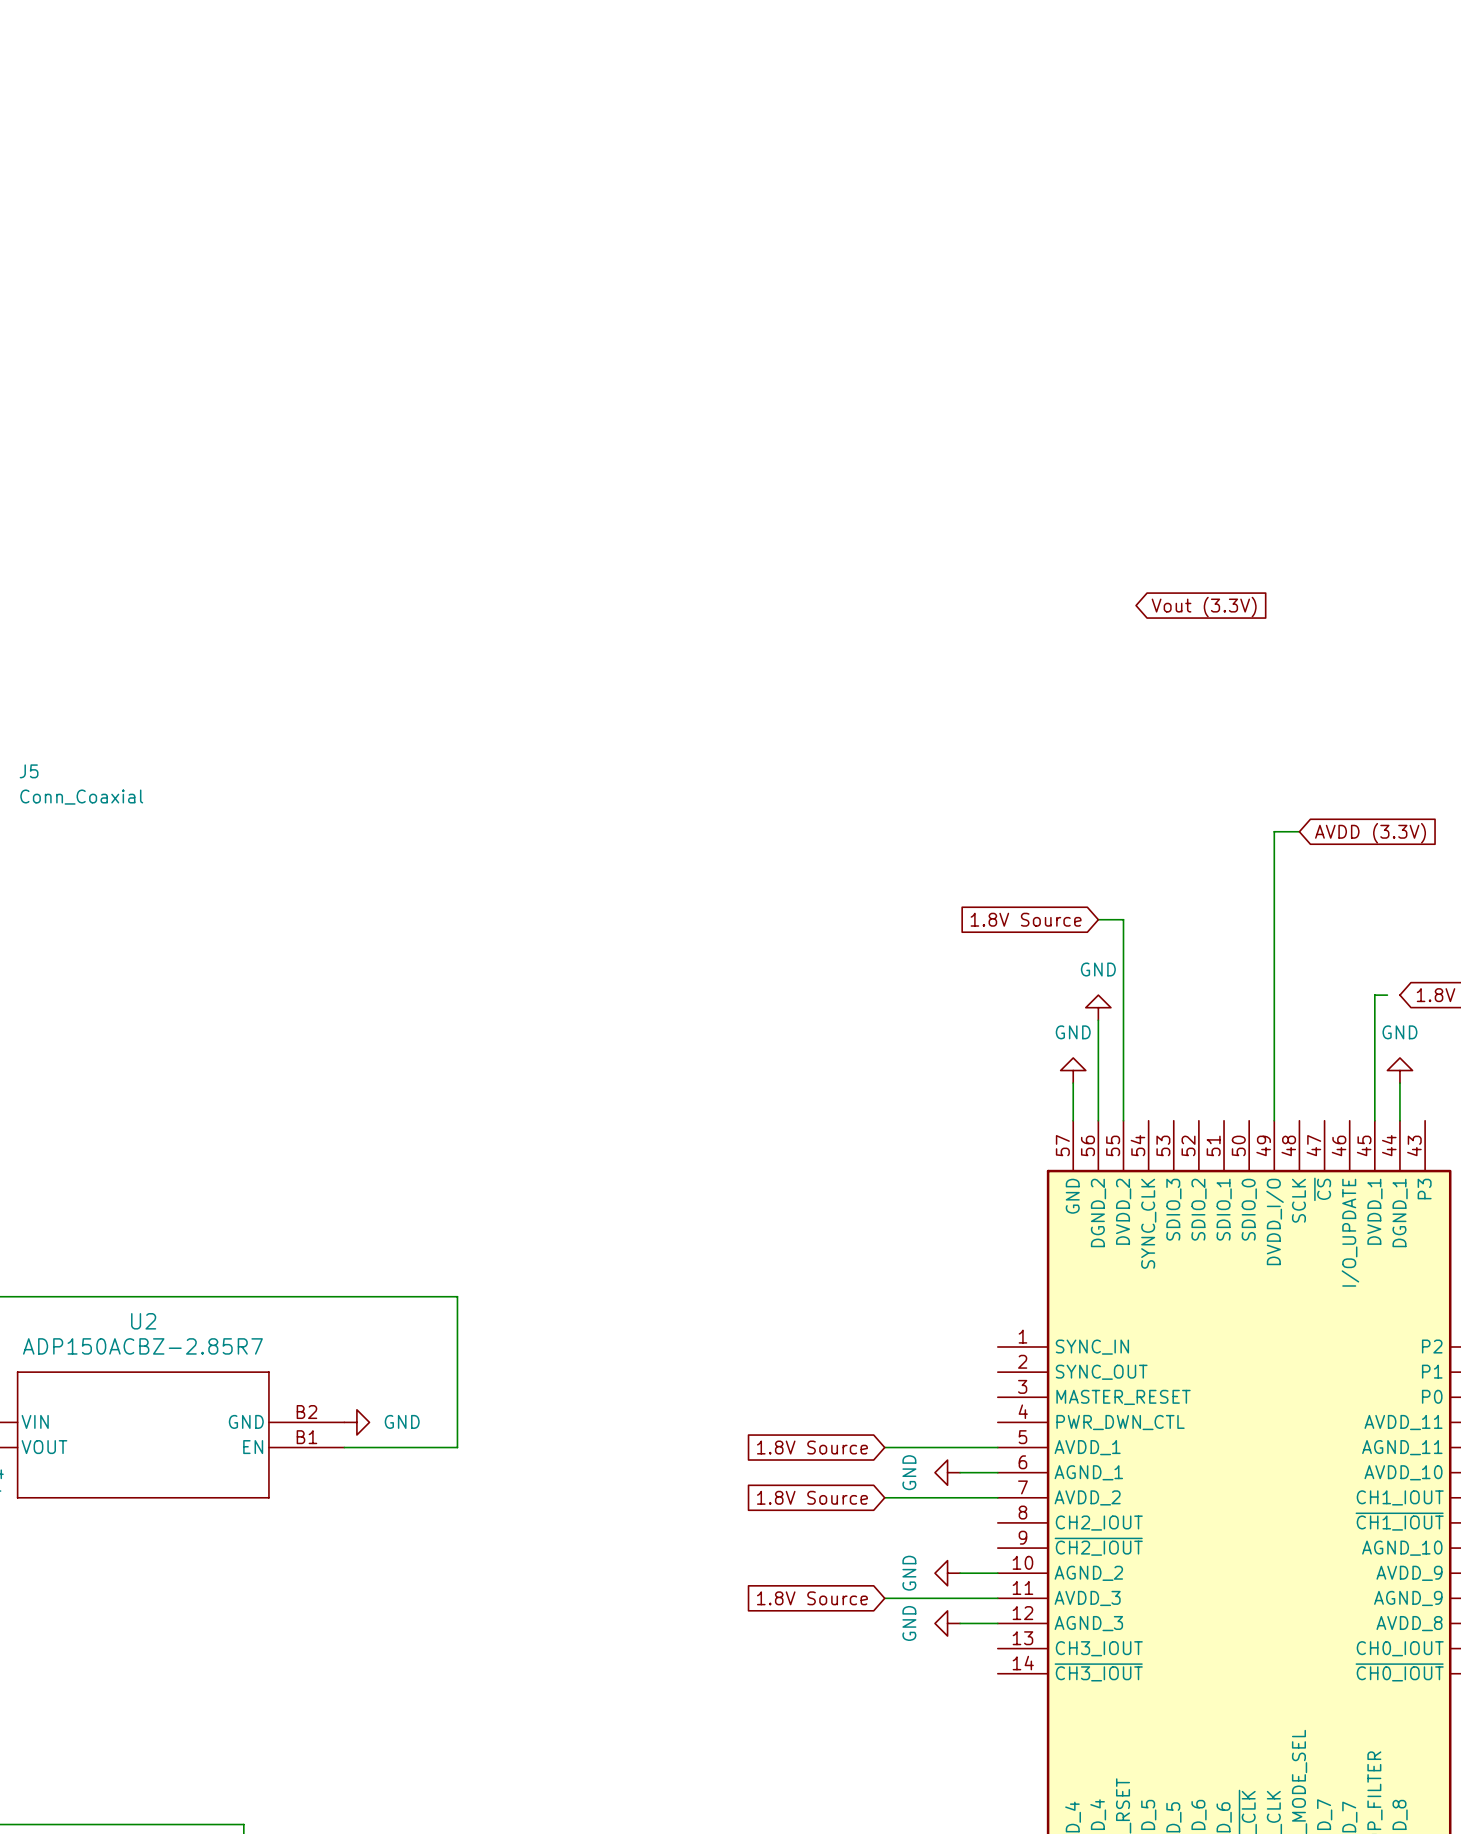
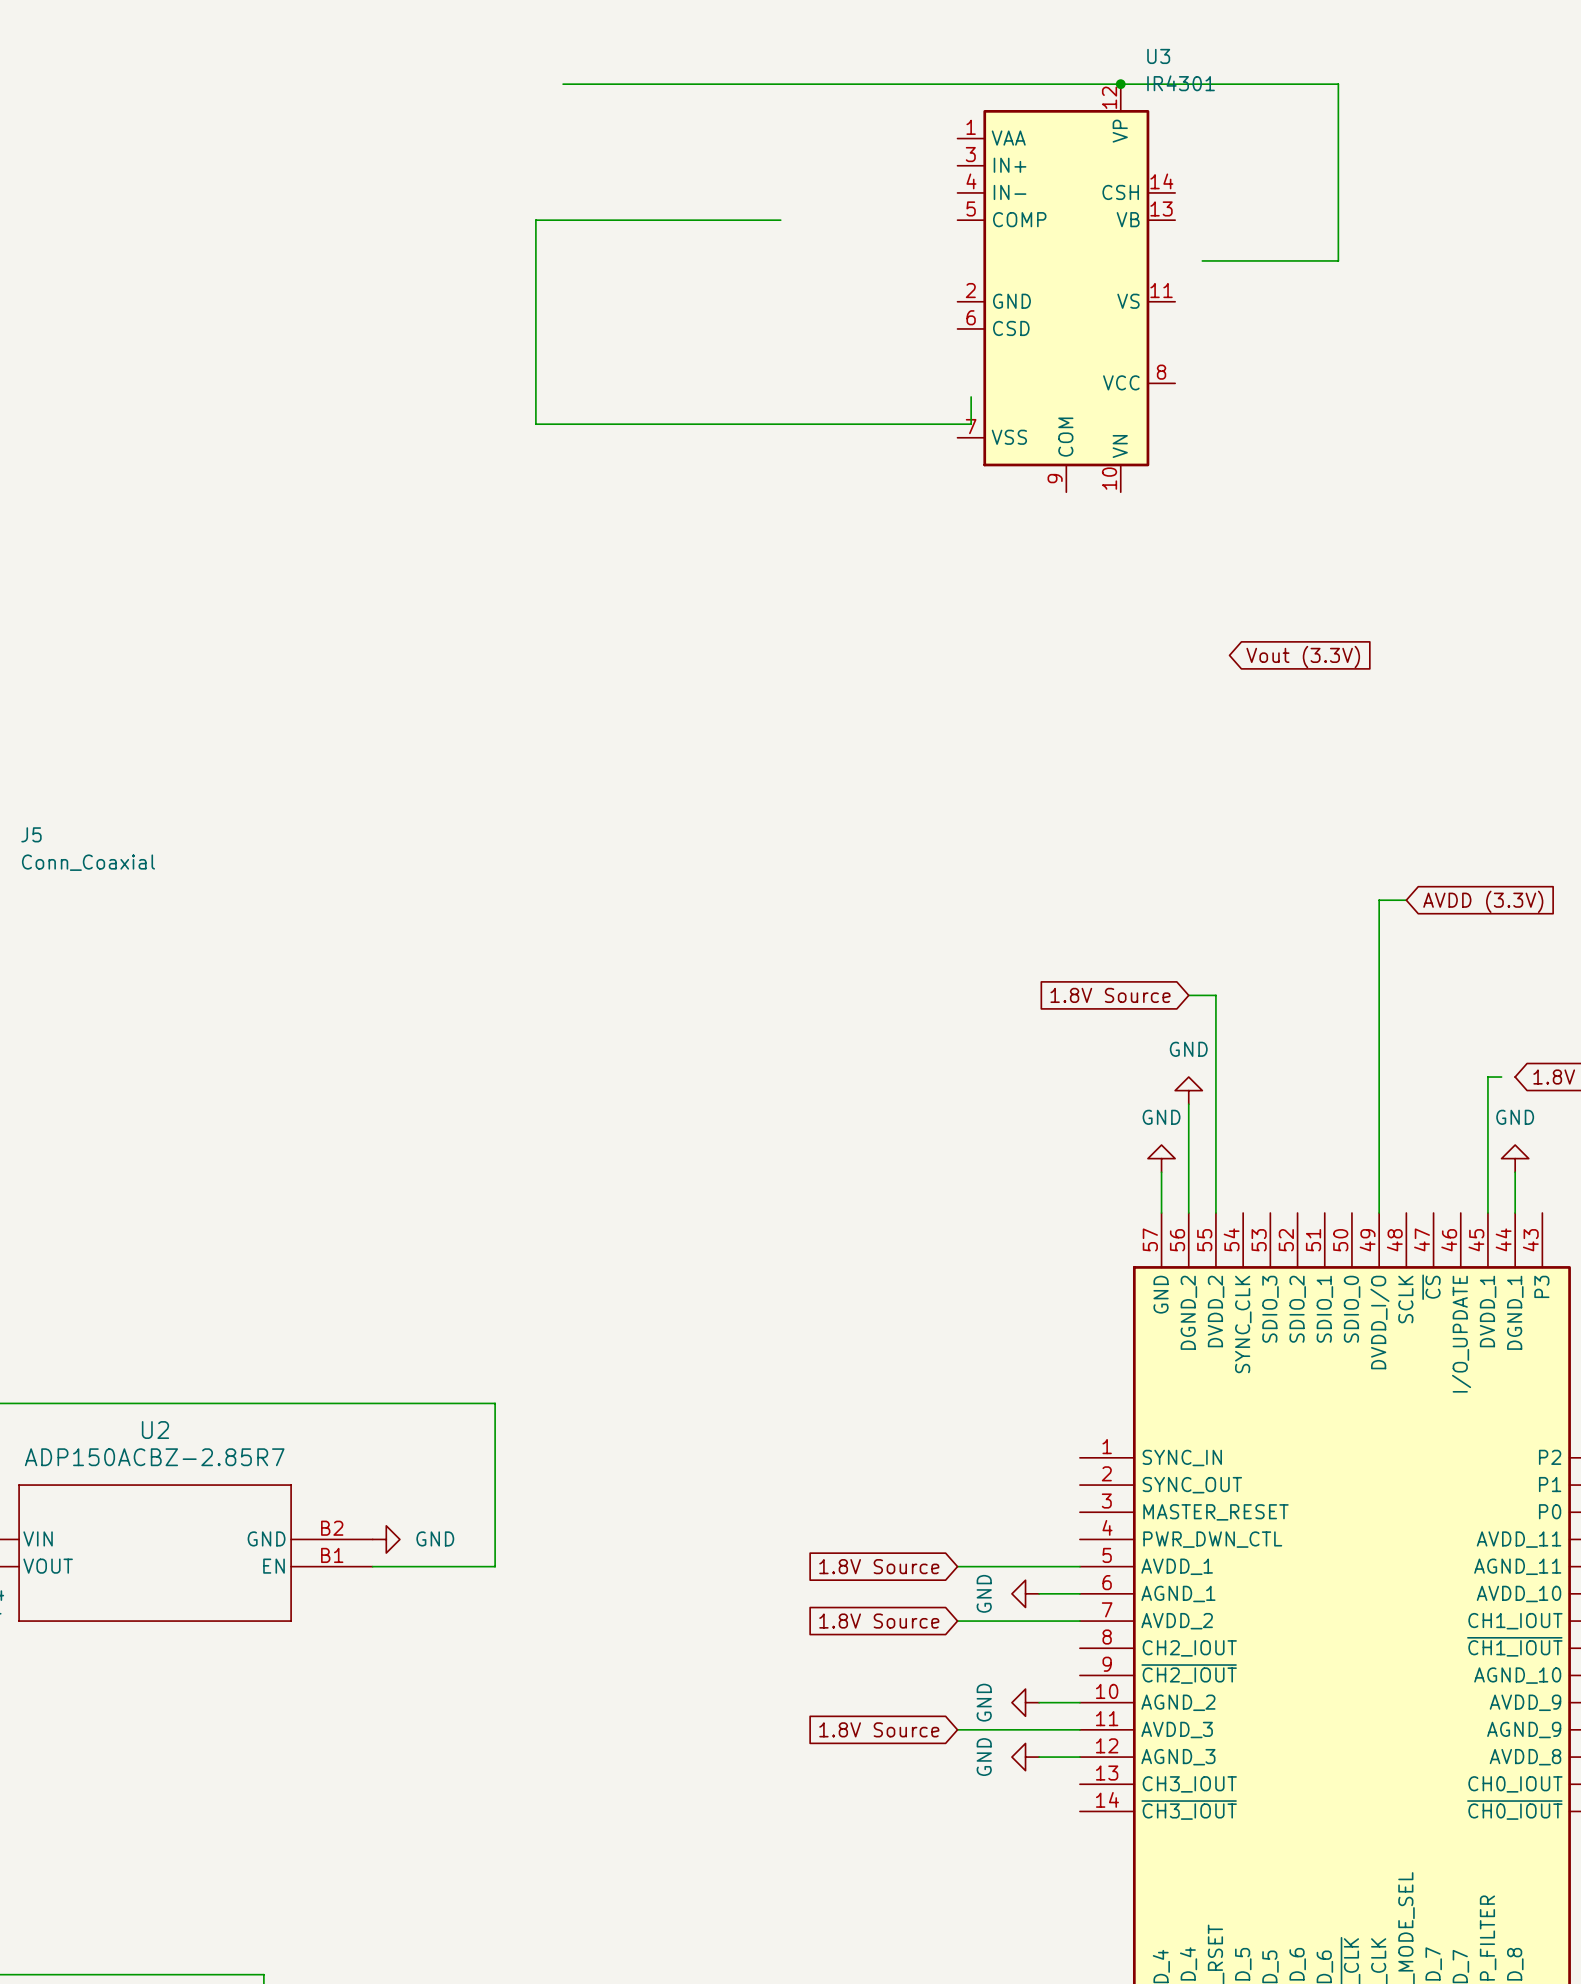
wire: none -> (563, 84) (1338, 84) (1338, 260) (1202, 260)
junction: none -> (1120, 84)
wire: none -> (780, 220) (535, 220) (535, 424) (971, 424) (971, 396)
U3: none -> IR4301 (1066, 288)

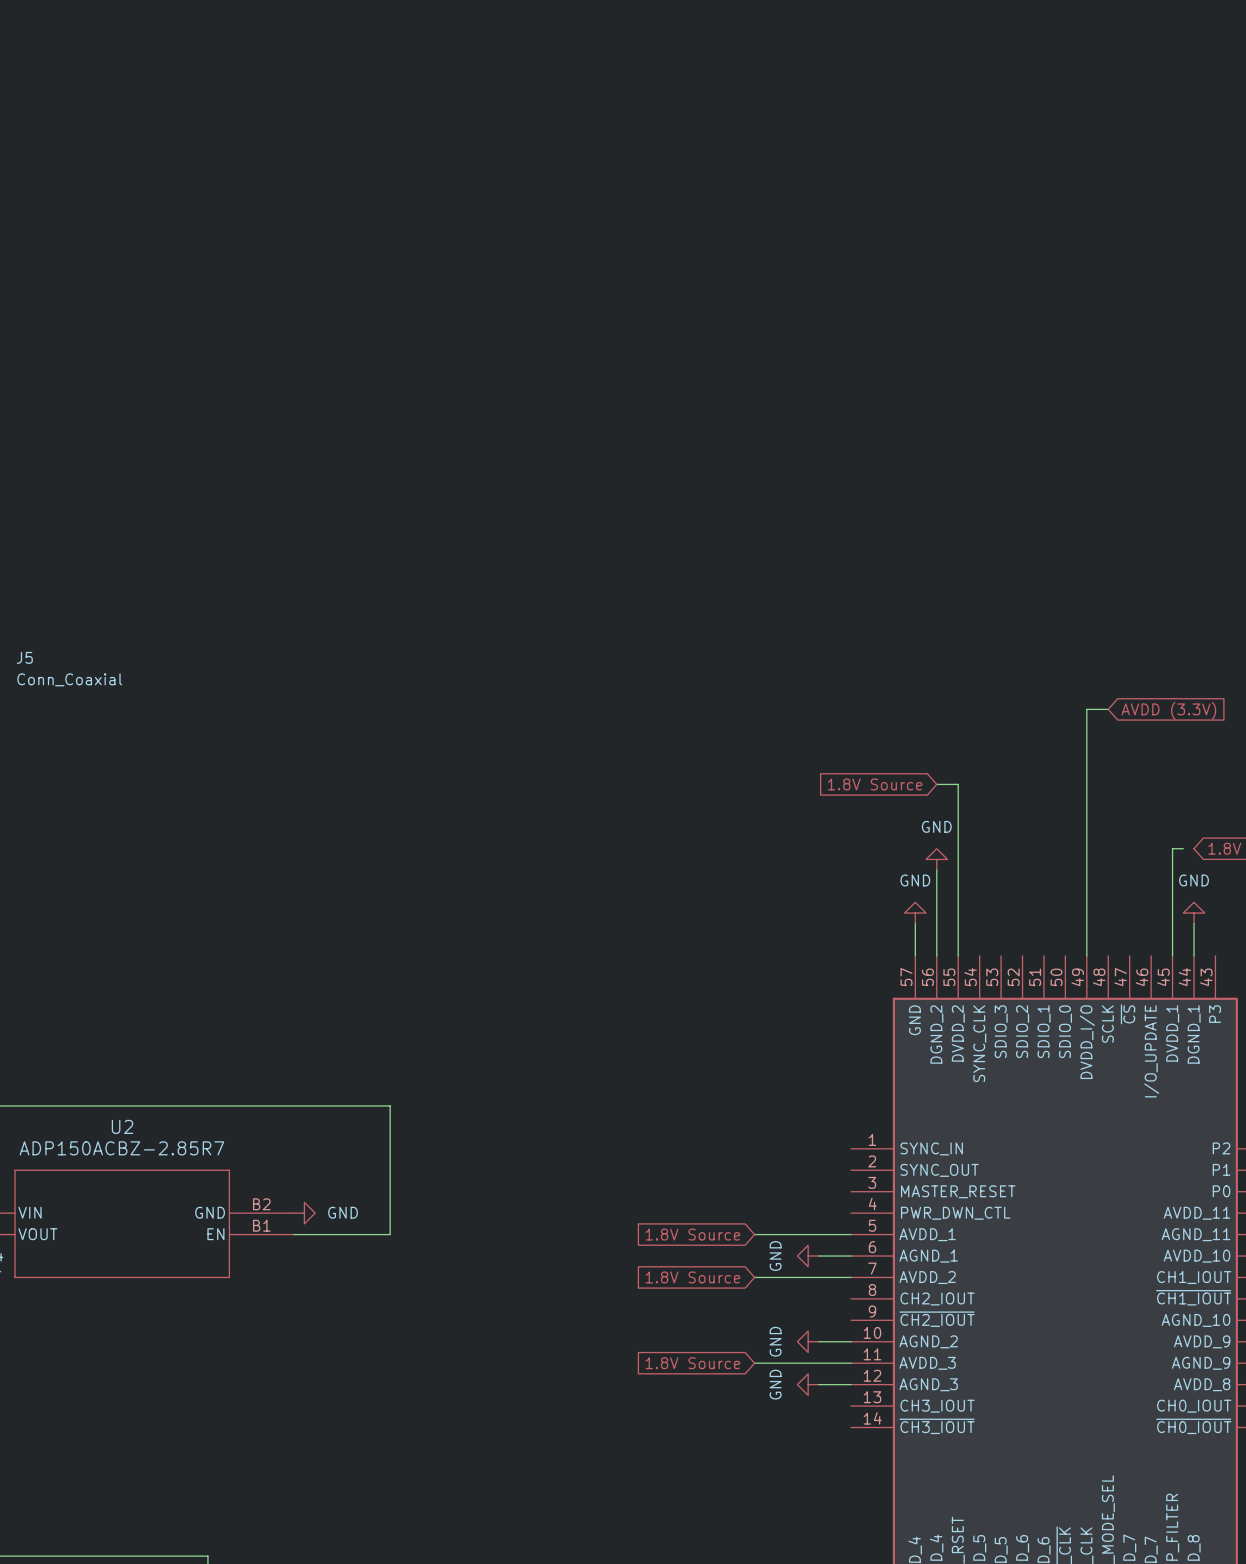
wire: (563, 84) (1338, 84) (1338, 260) (1202, 260) -> none
junction: (1120, 84) -> none
wire: (780, 220) (535, 220) (535, 424) (971, 424) (971, 396) -> none
U3: IR4301 (1066, 288) -> none
global label: Vout (3.3V) (1303, 657) -> none

